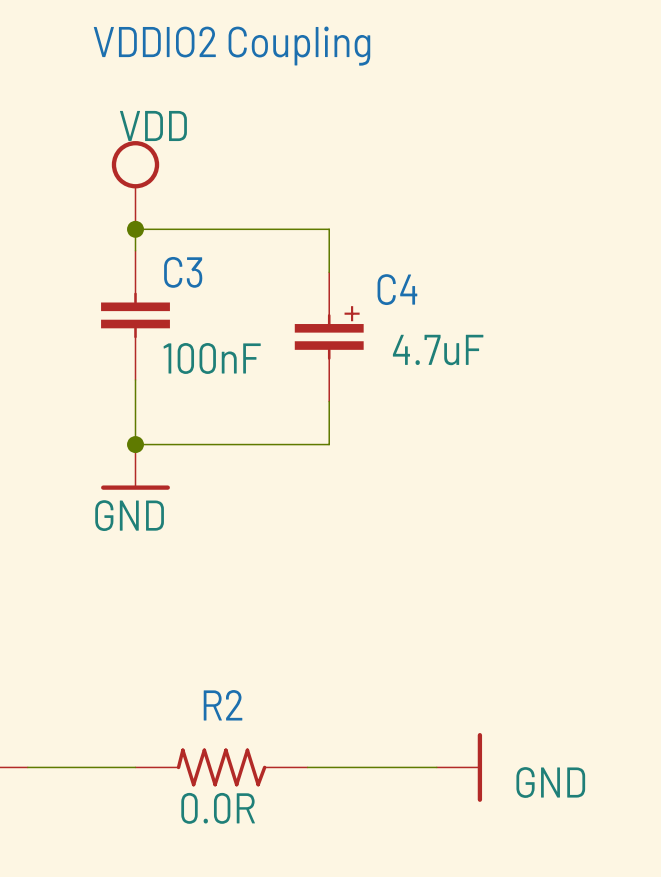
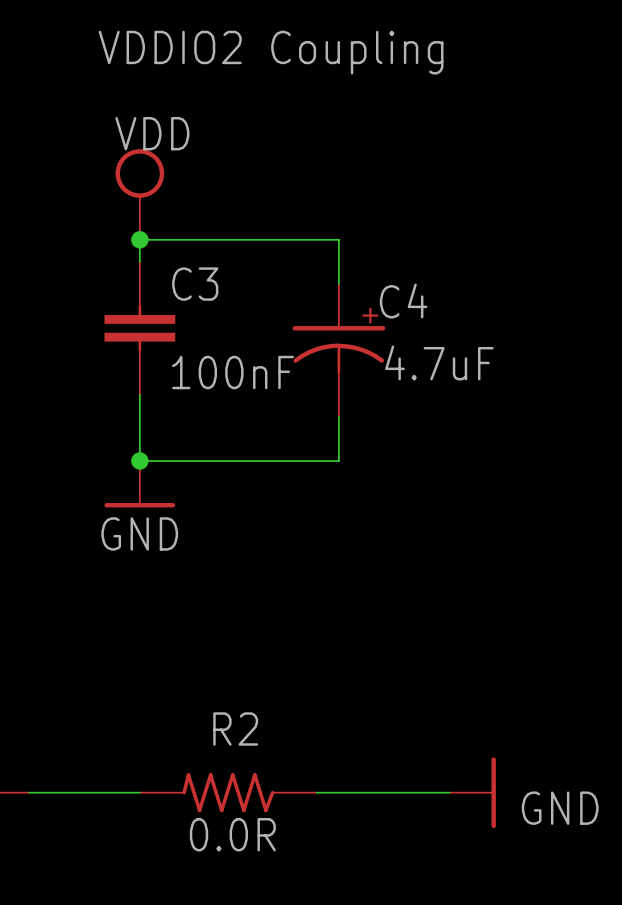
C4 symbol: [294, 272, 364, 402] -> [292, 284, 386, 417]

